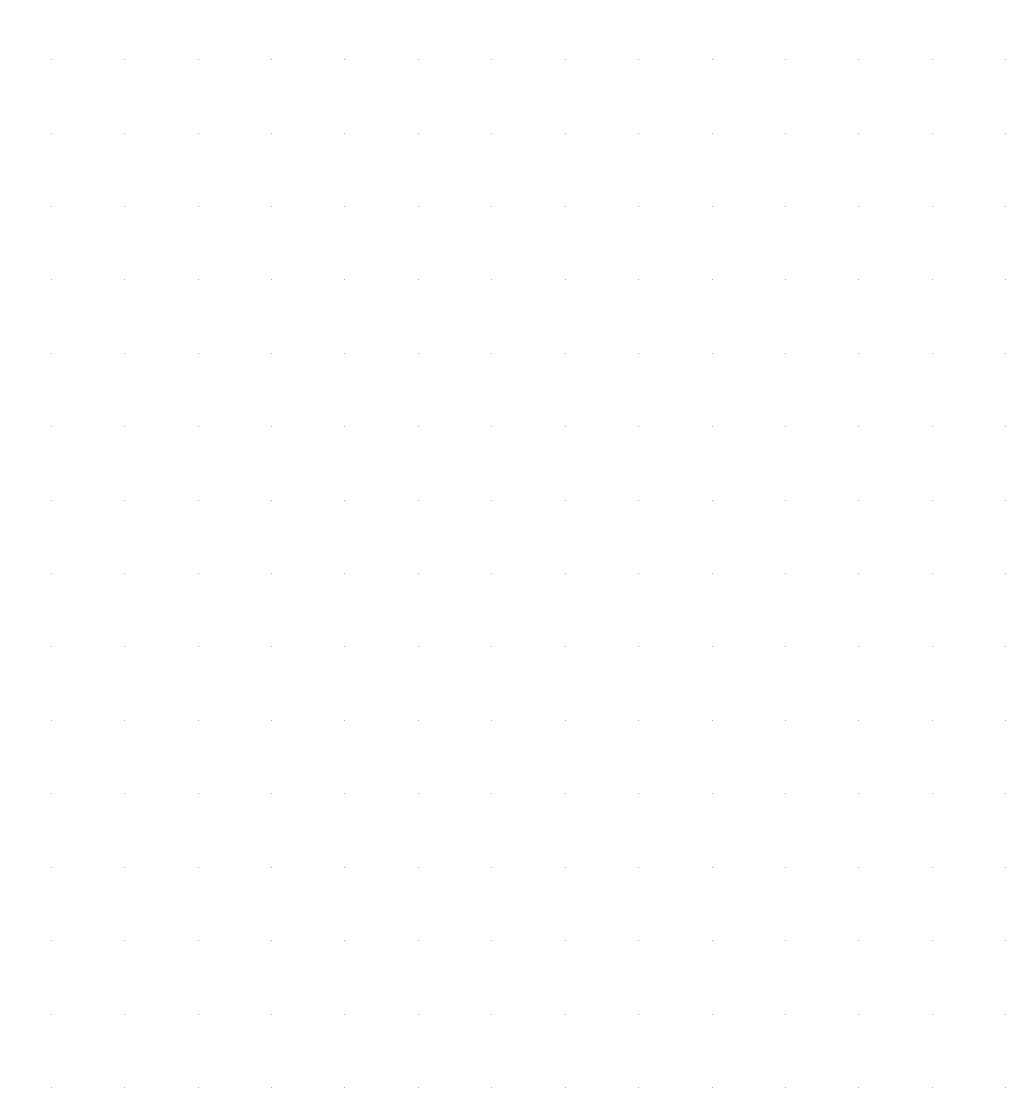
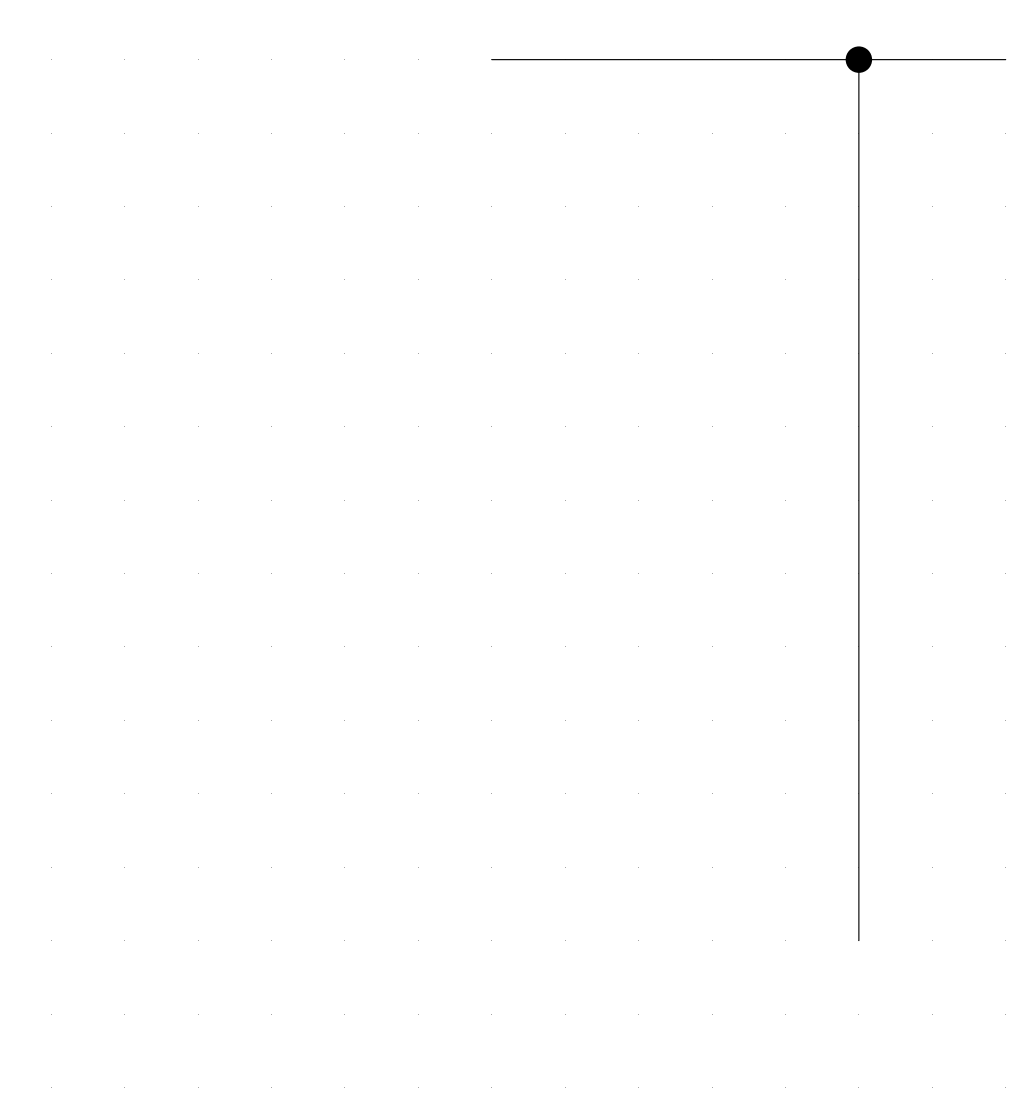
wire: none -> (491, 59) (1005, 59)
wire: none -> (858, 59) (858, 940)
junction: none -> (858, 59)

